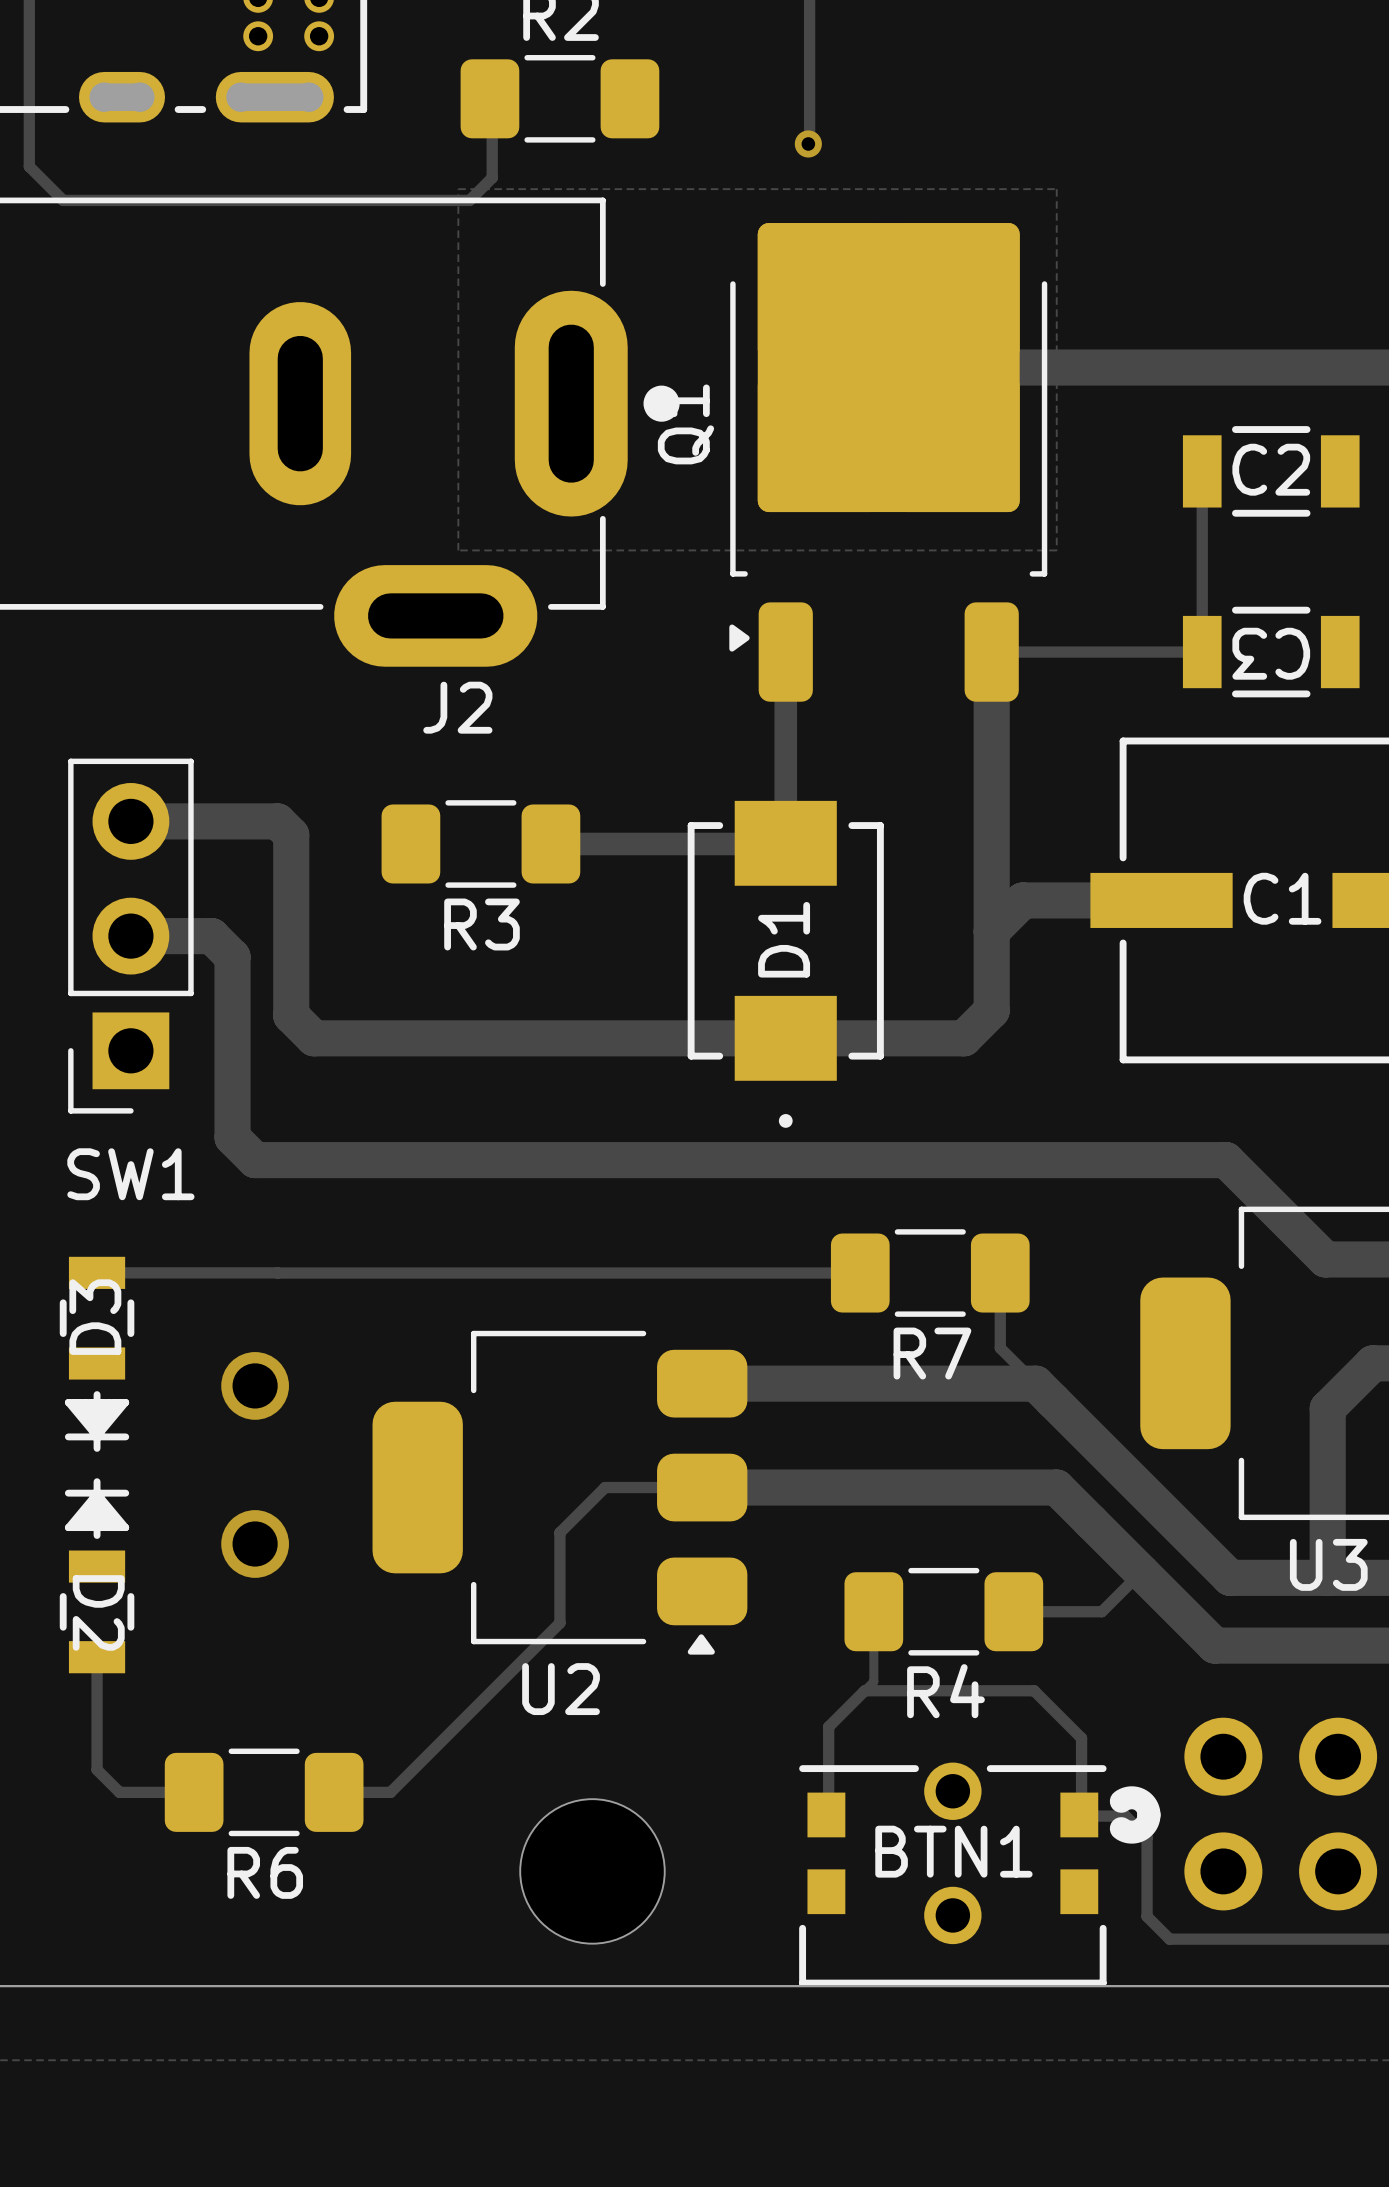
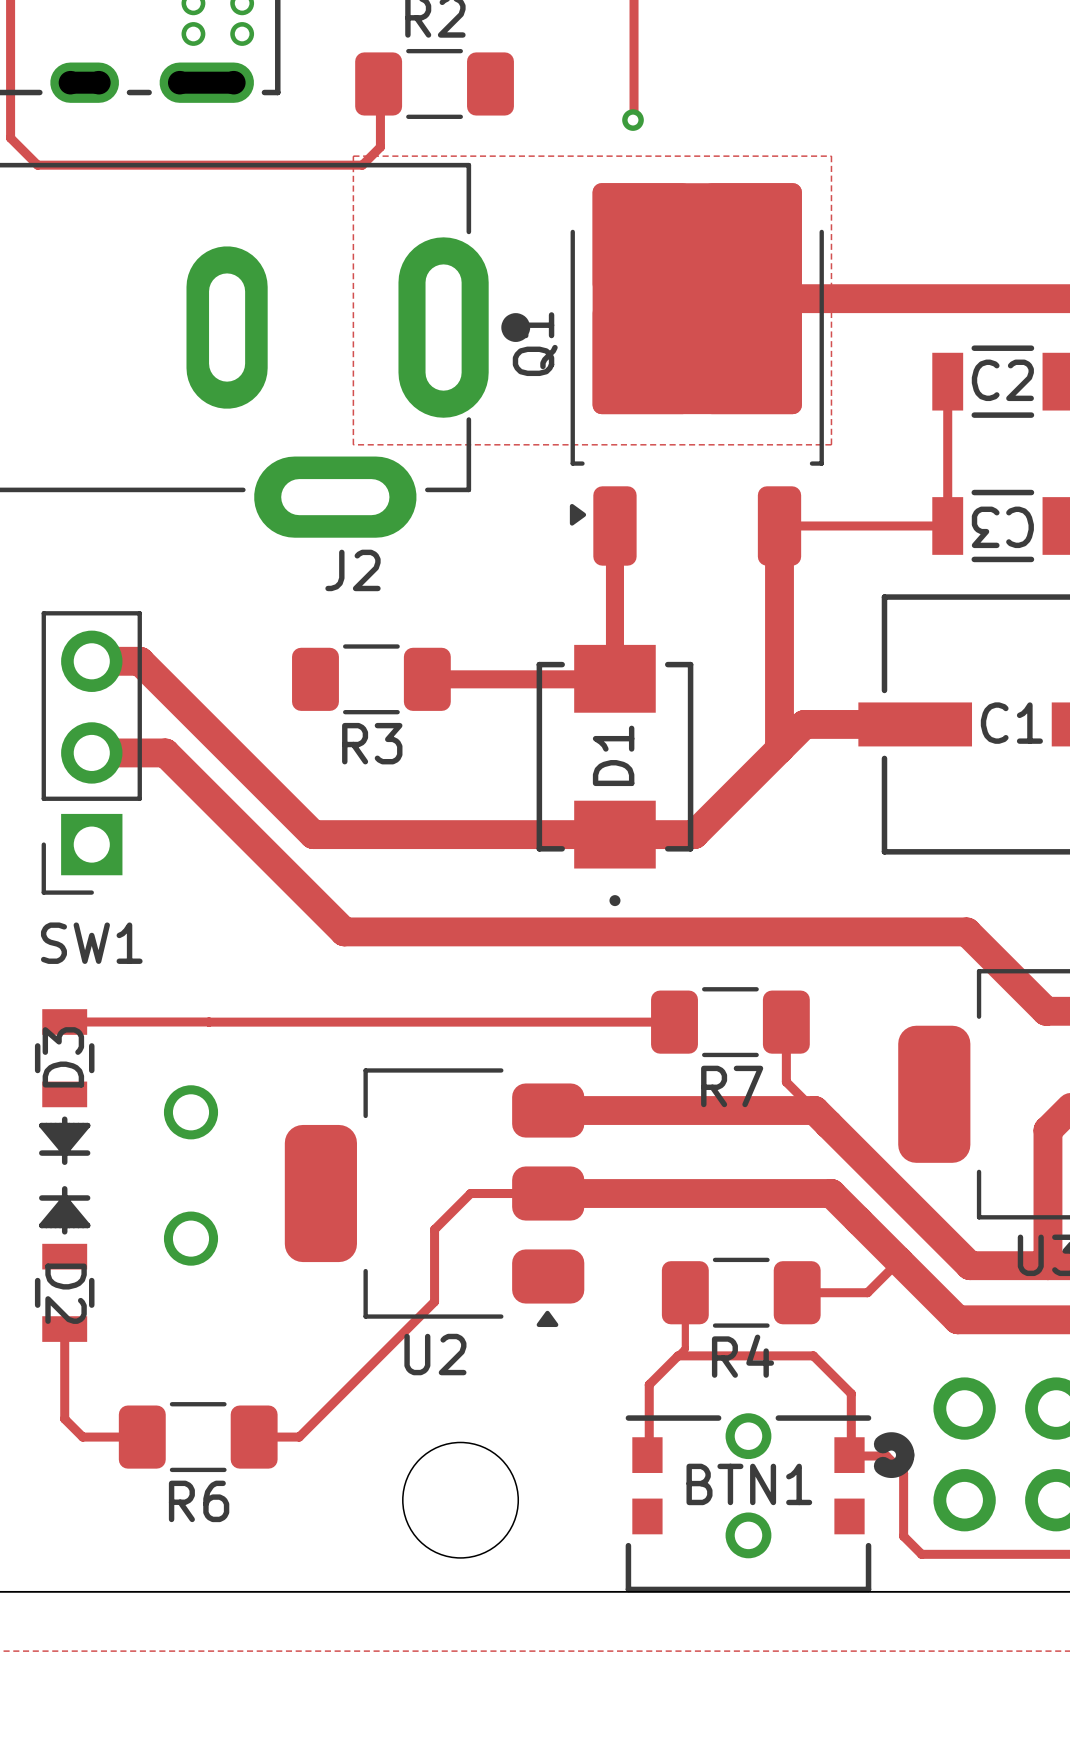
track: (191, 821) (277, 821) (291, 834) (291, 1015) (313, 1038) (408, 1038) -> (140, 661) (313, 834)
track: (991, 931) (991, 1010) (964, 1038) (884, 1038) -> (779, 749) (694, 834)
track: (211, 936) (232, 956) (232, 1137) (255, 1160) (447, 1160) -> (156, 752) (165, 752) (344, 931)

